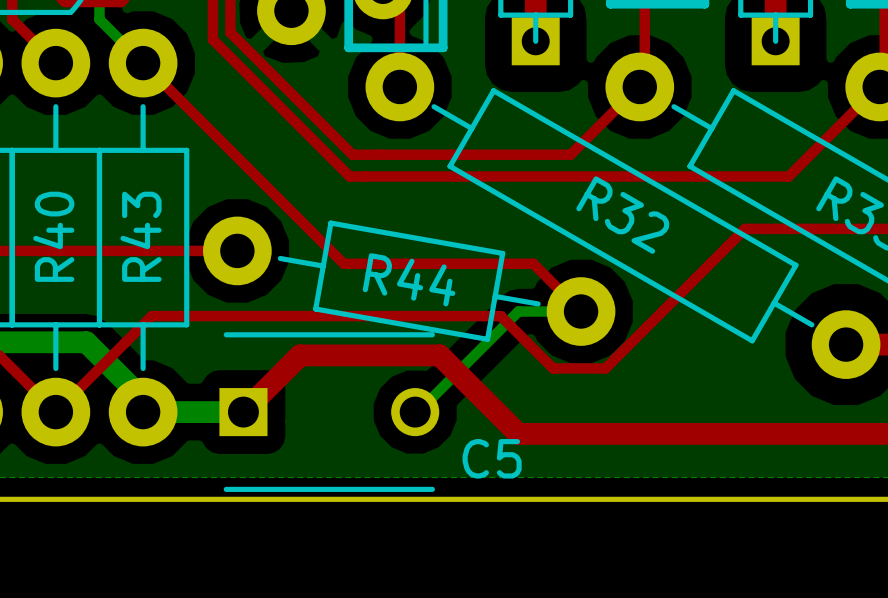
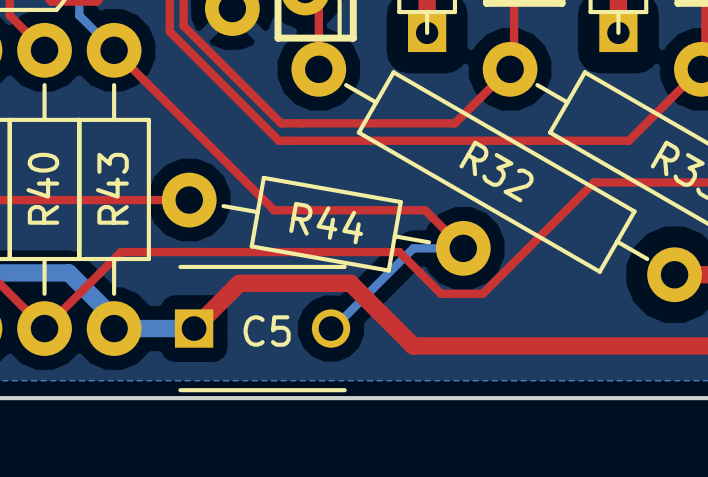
C5 name position: C5 (492, 458) -> C5 (267, 331)

